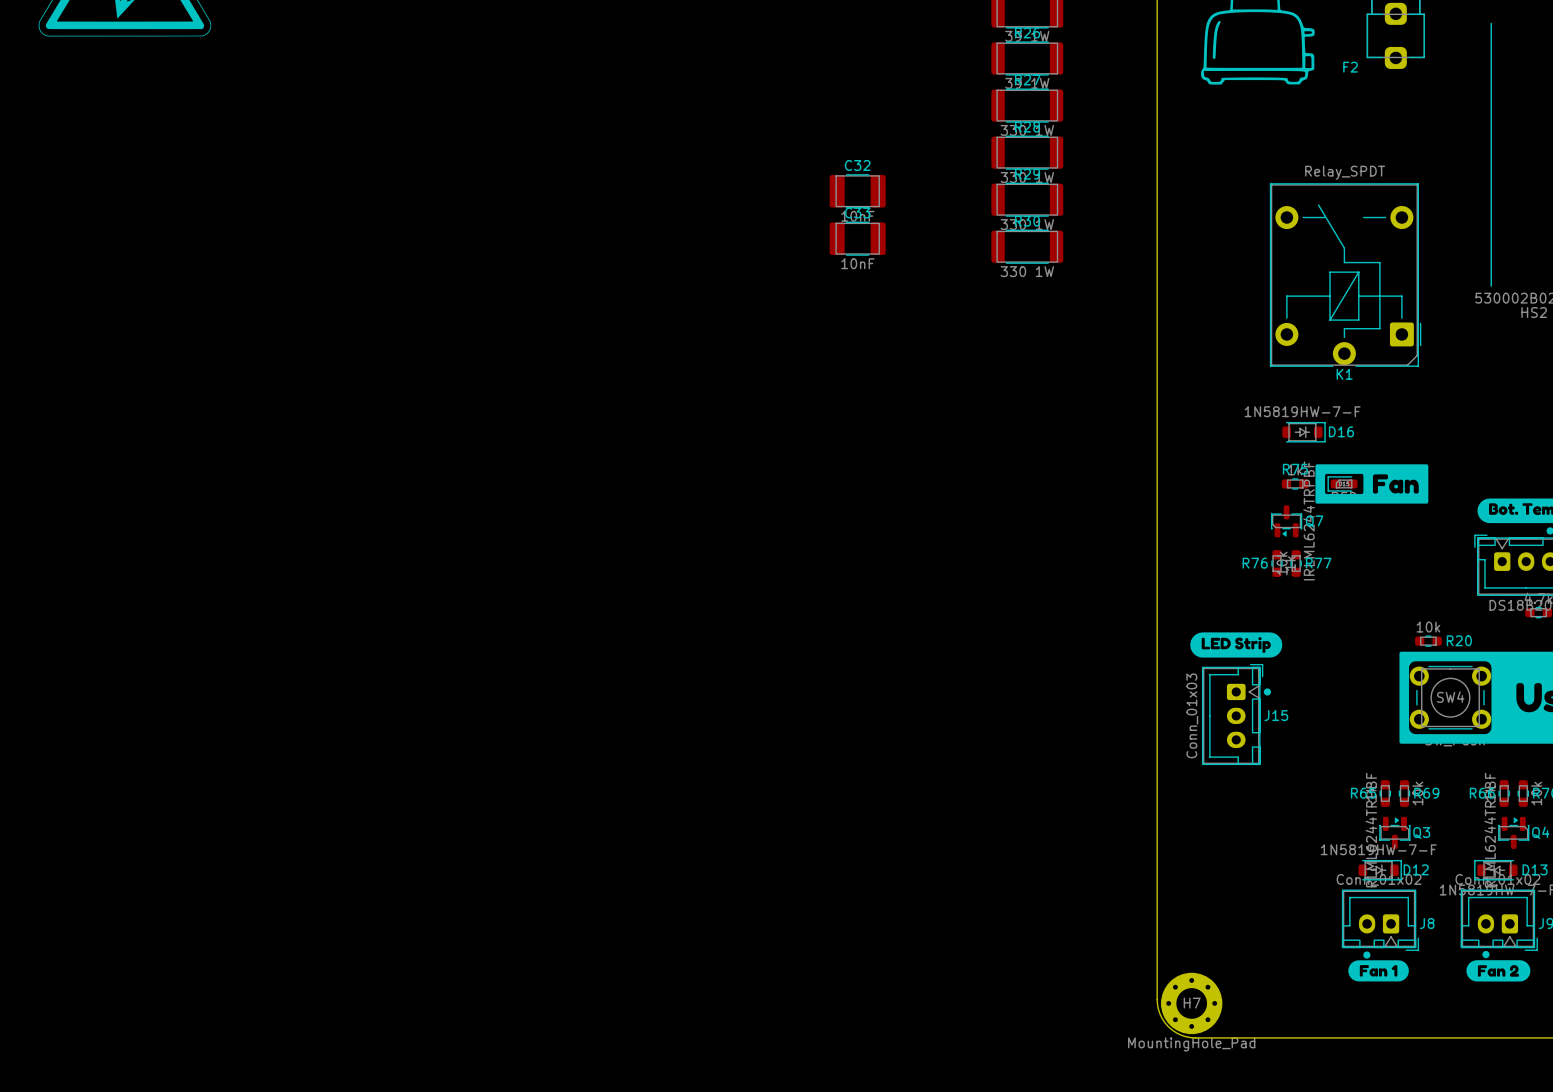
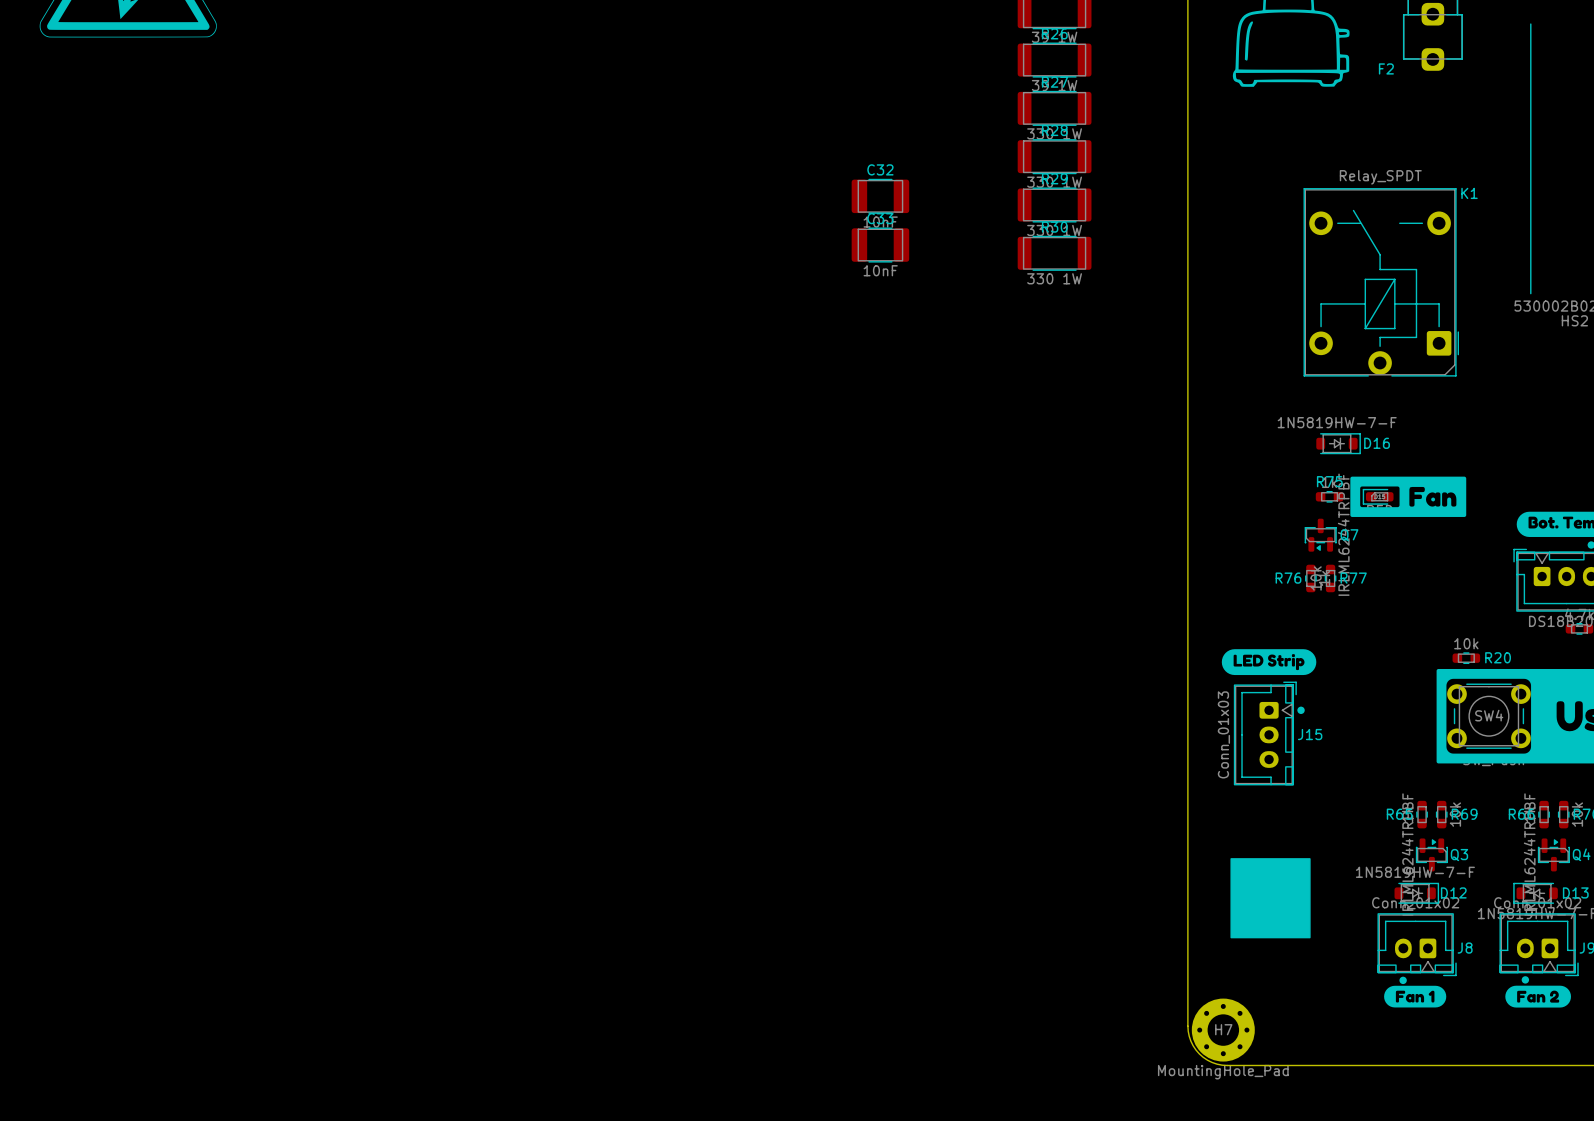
K1 name position: K1 (1344, 374) -> K1 (1469, 193)
drawing: none -> [1230, 858, 1311, 939]

